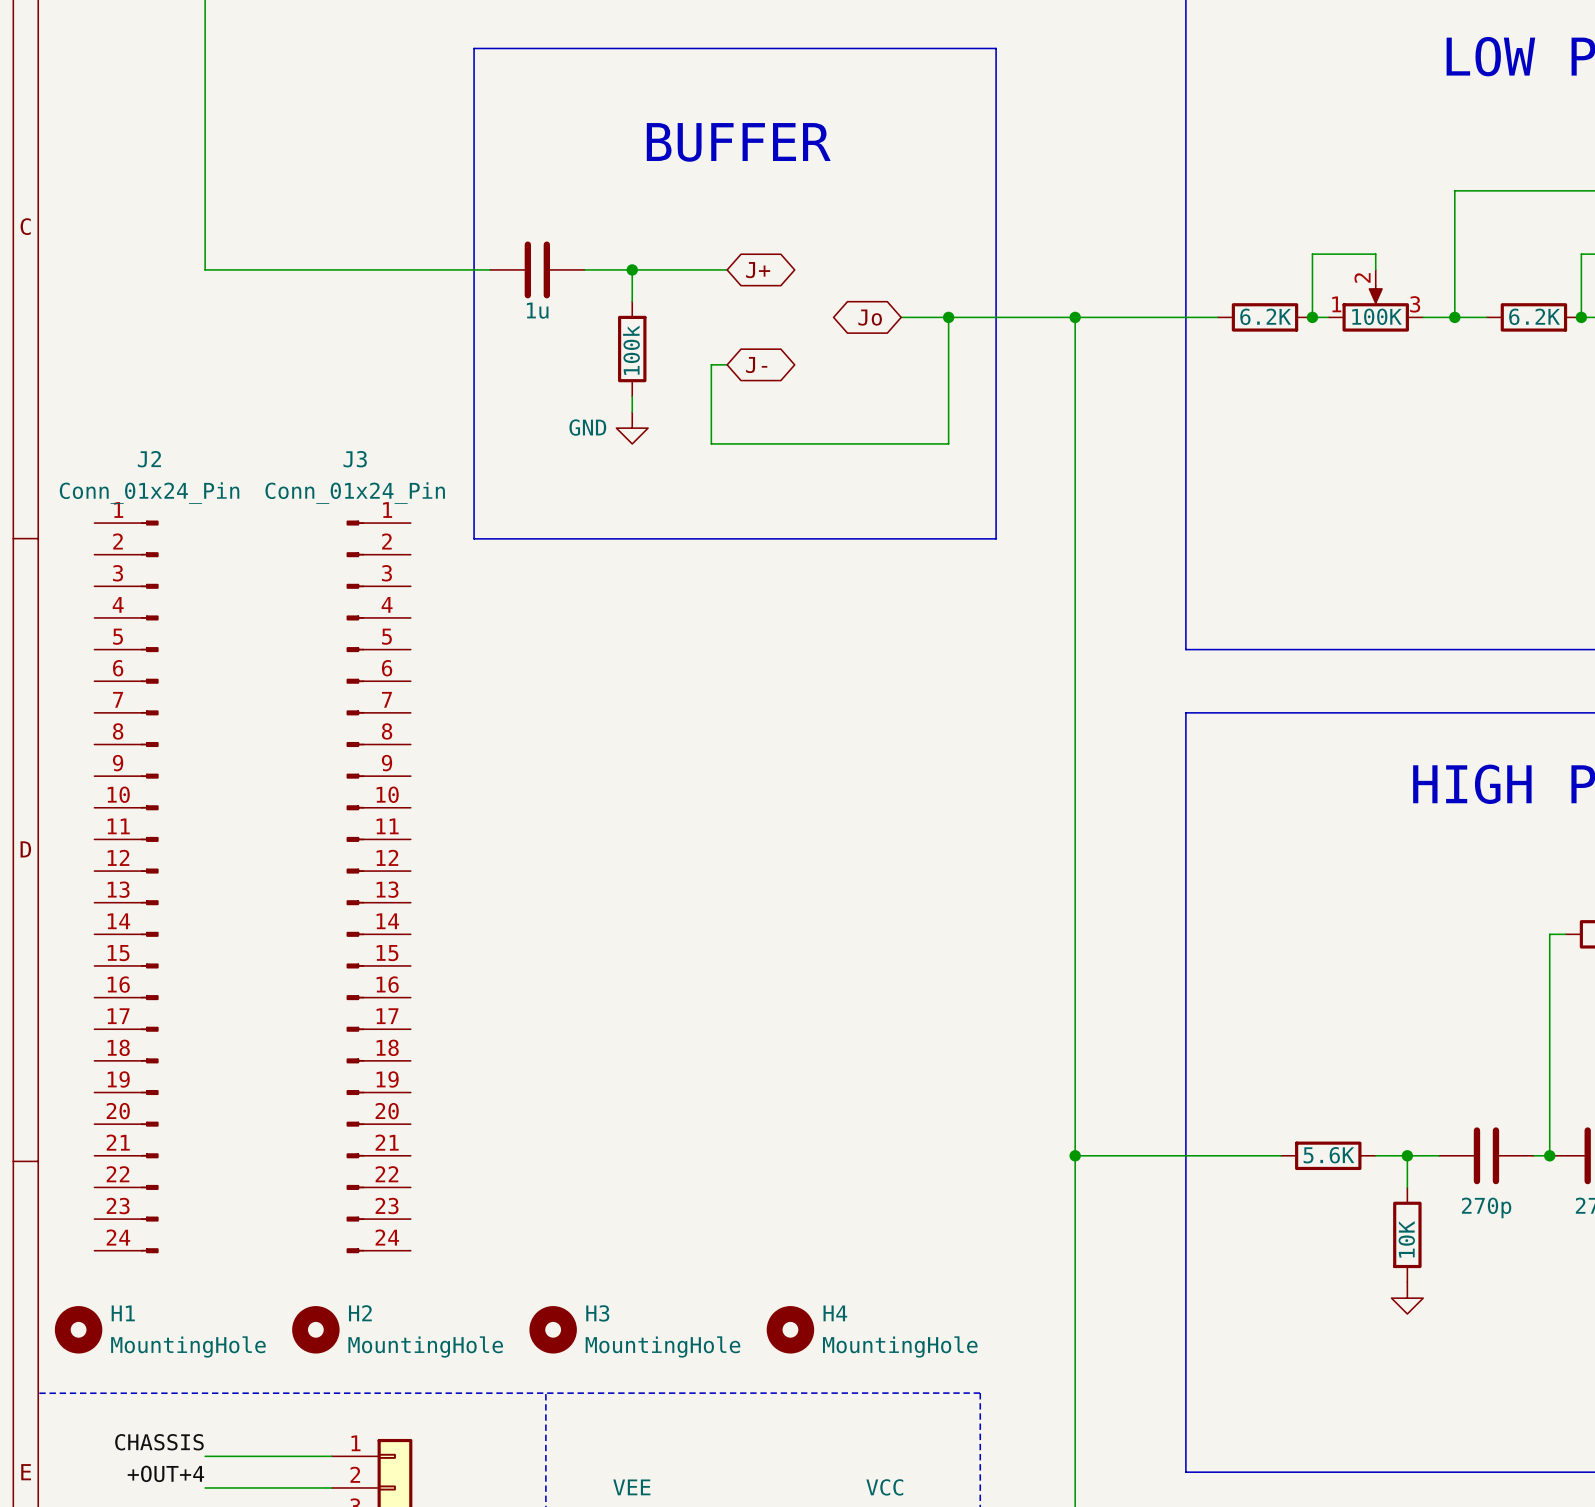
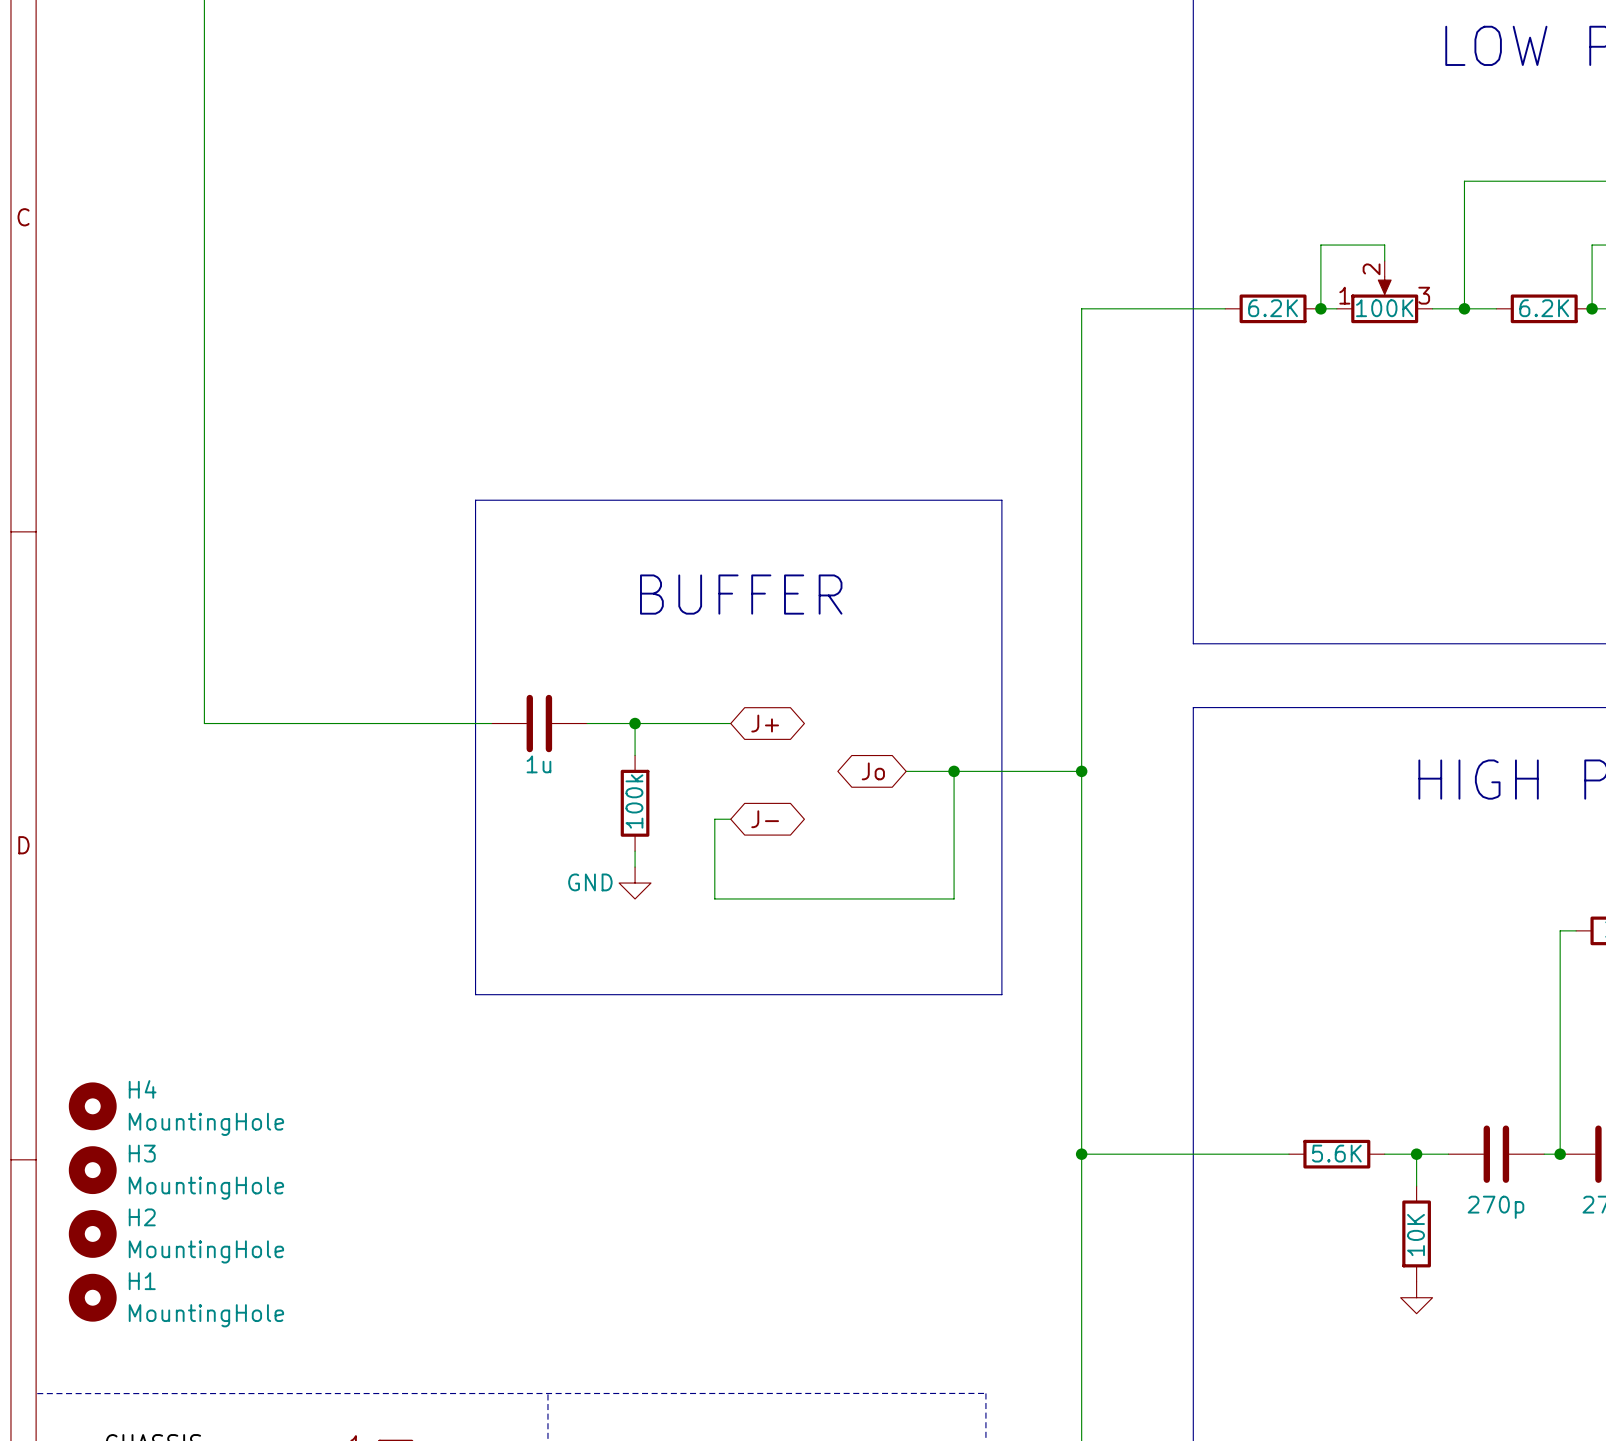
text: BUFFER (738, 142) -> none
wire: (205, 269) (489, 269) -> (204, 260) (204, 723) (491, 723)
part: 1u (537, 269) -> none
wire: (584, 269) (727, 269) -> none
wire: (632, 269) (632, 301) -> none
junction: (632, 269) -> none
global label: J+ (758, 270) -> none
global label: Jo (870, 317) -> none
wire: (901, 317) (1075, 317) -> none
wire: (948, 317) (948, 443) (711, 443) (711, 364) (727, 364) -> none
junction: (948, 317) -> none
junction: (1075, 317) -> none
part: 100k (632, 349) -> none
global label: J- (756, 365) -> none
wire: (632, 396) (632, 412) -> none
power symbol: GND (632, 428) -> none
line: (474, 507) (474, 48) (996, 48) (996, 507) -> (475, 500) (1001, 500)
line: (474, 538) (996, 538) -> (475, 532) (475, 994) (1001, 994) (1001, 532)
text: none -> BUFFER (741, 594)
part: none -> 1u (539, 723)
wire: none -> (587, 723) (730, 723)
wire: none -> (635, 723) (635, 755)
junction: none -> (635, 723)
global label: none -> J+ (765, 723)
global label: none -> Jo (873, 771)
wire: none -> (906, 771) (1081, 771)
wire: none -> (954, 771) (954, 898) (714, 898) (714, 819) (730, 819)
junction: none -> (954, 771)
junction: none -> (1081, 771)
part: none -> 100k (635, 803)
global label: none -> J- (765, 819)
wire: none -> (635, 851) (635, 867)
J2: Conn_01x24_Pin (126, 886) -> none
J3: Conn_01x24_Pin (378, 886) -> none
power symbol: none -> GND (635, 883)
H1 position: (78, 1329) -> (92, 1297)
H2 position: (315, 1329) -> (92, 1233)
H3 position: (553, 1329) -> (92, 1170)
H4 position: (790, 1329) -> (92, 1106)

